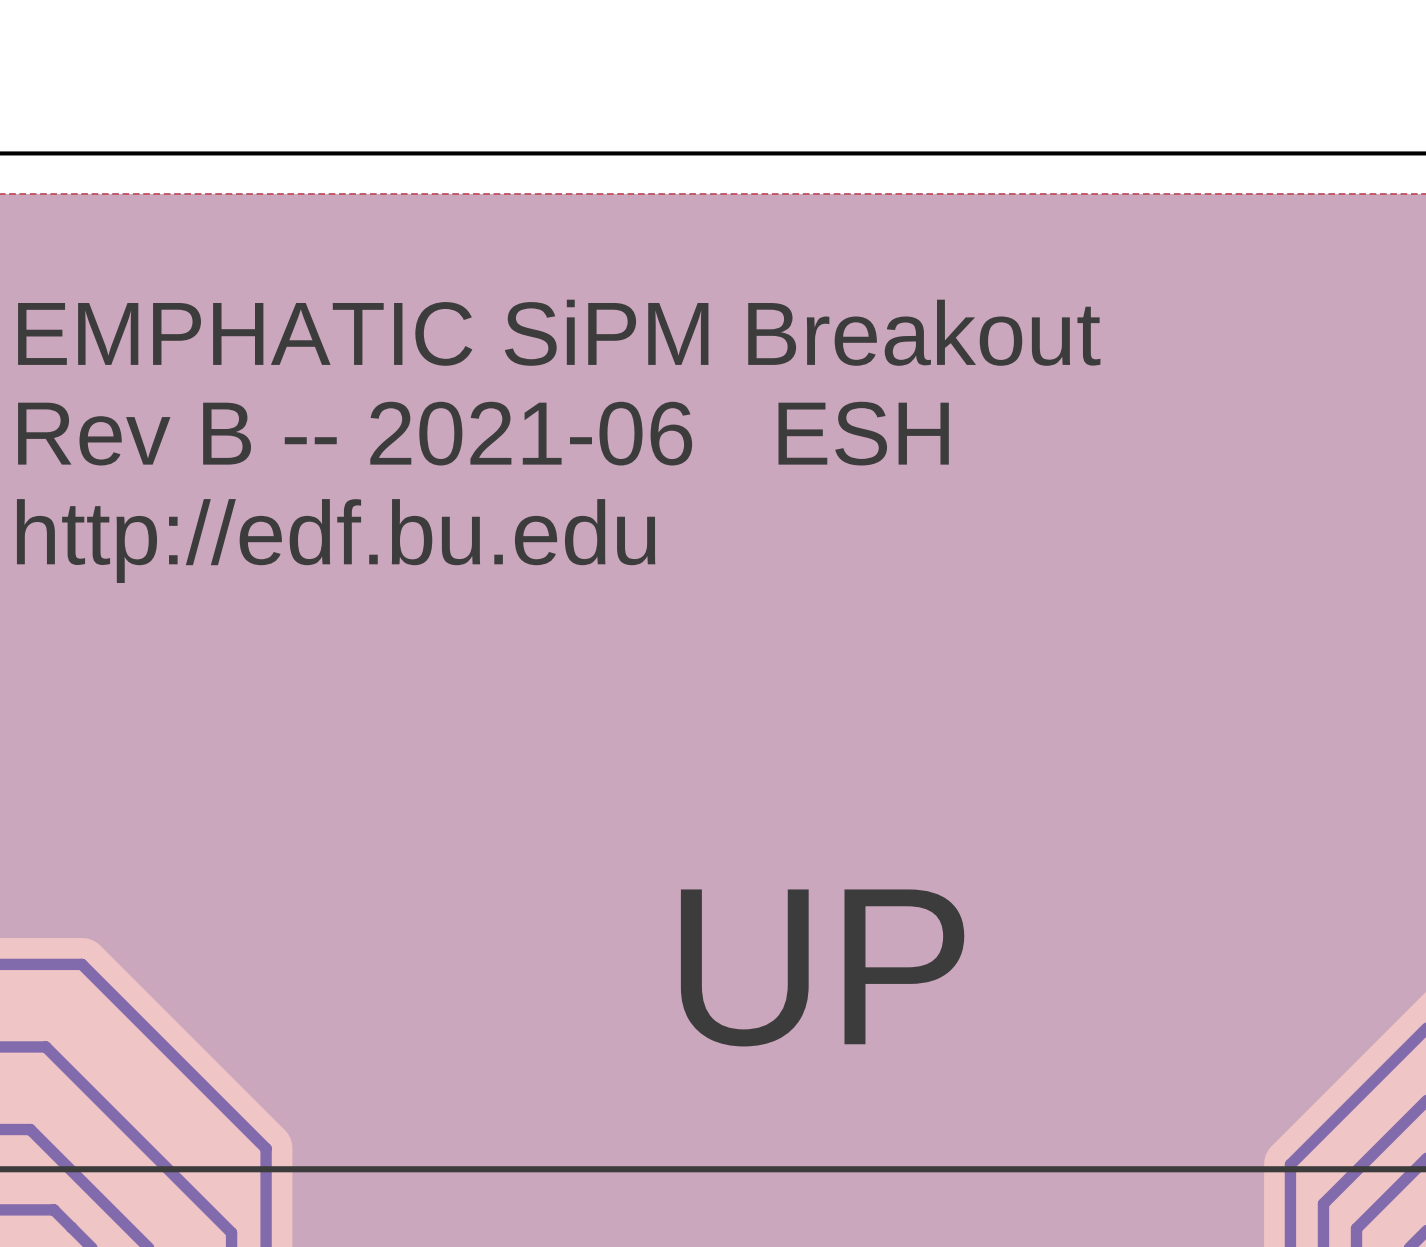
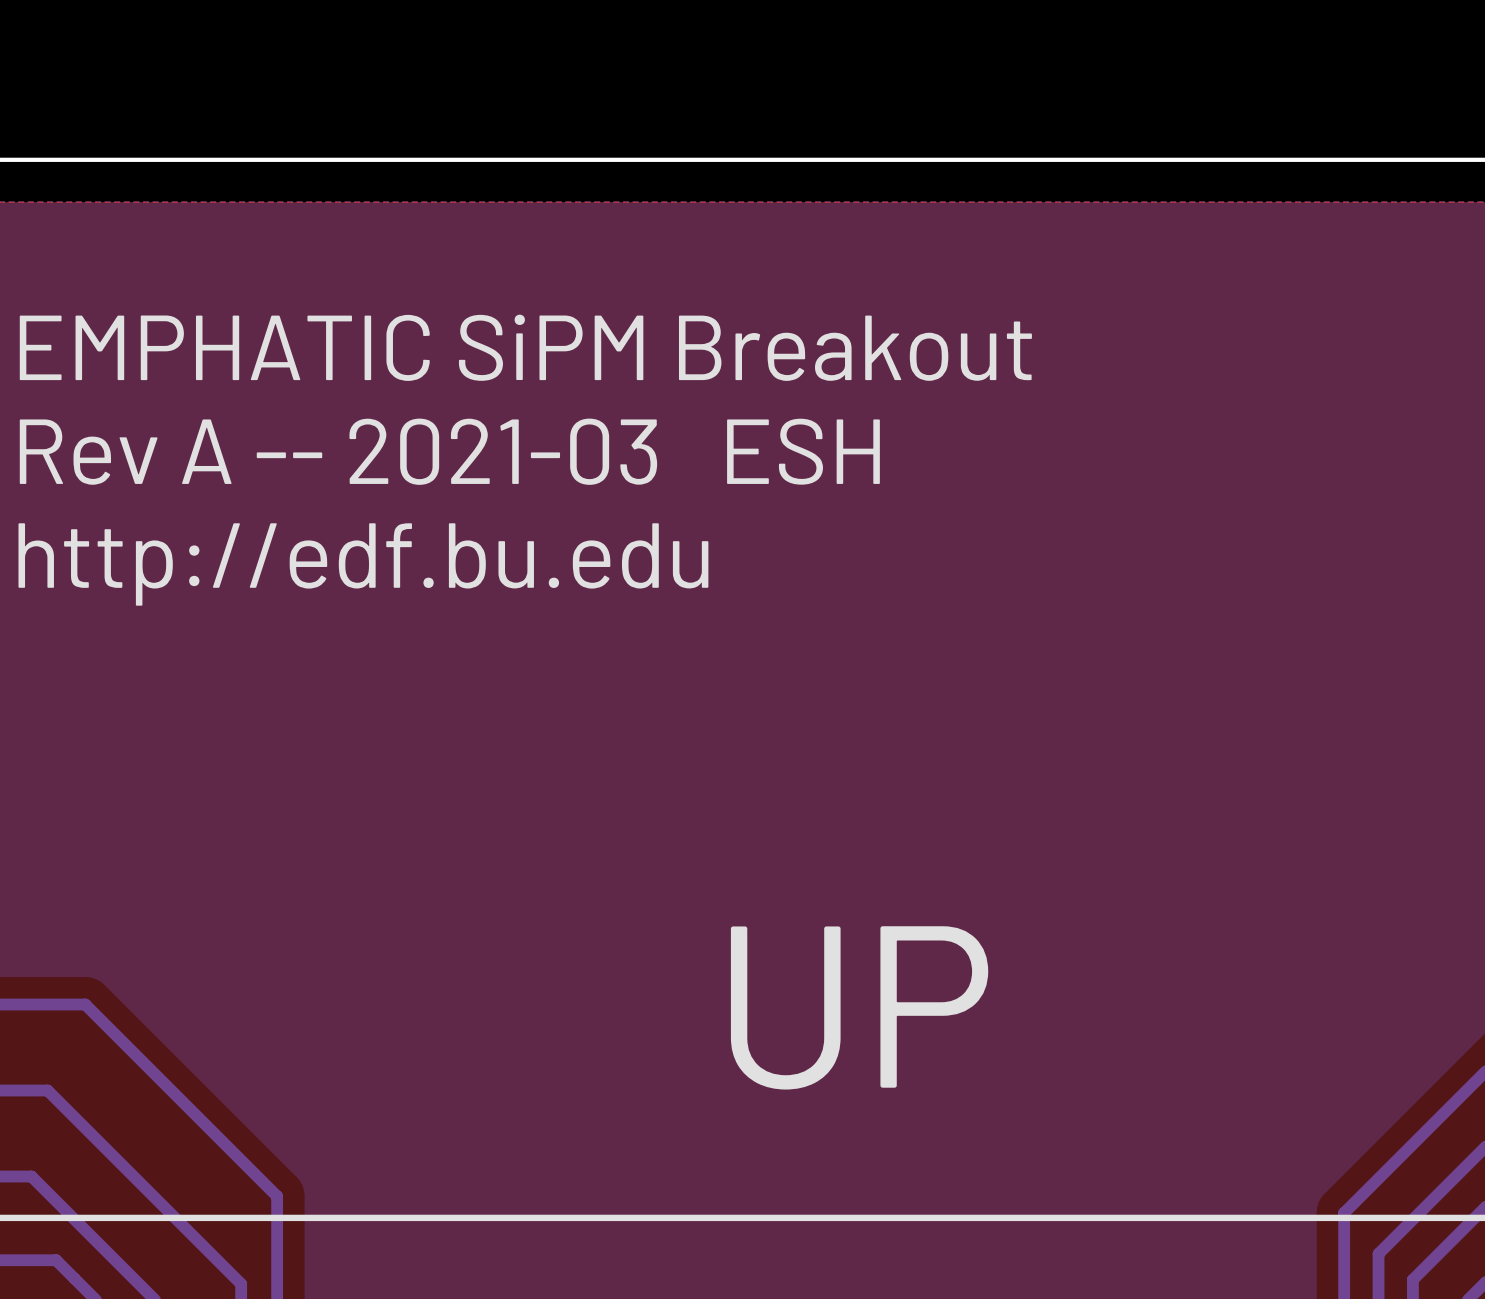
text: Rev B -- 2021-06 ESH (483, 433) -> Rev A -- 2021-03 ESH (449, 451)

